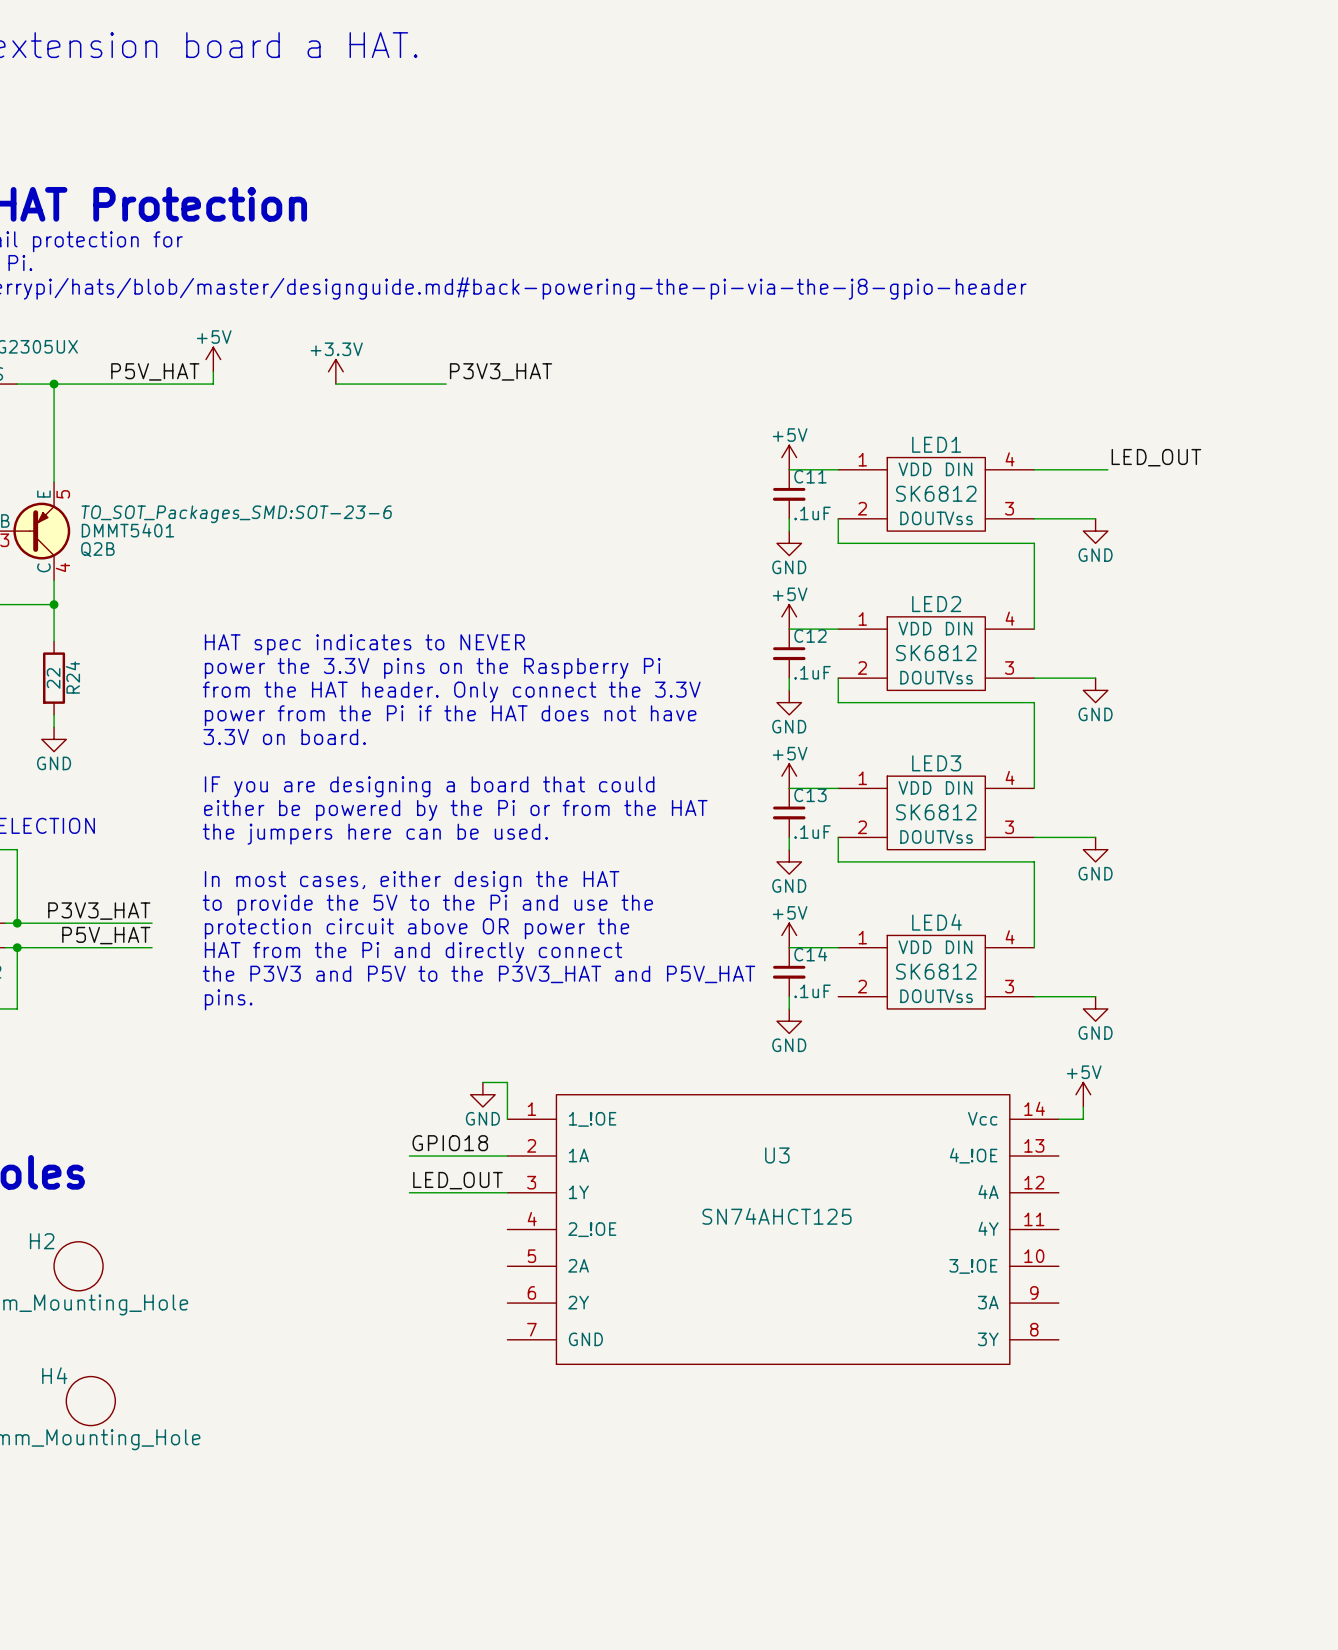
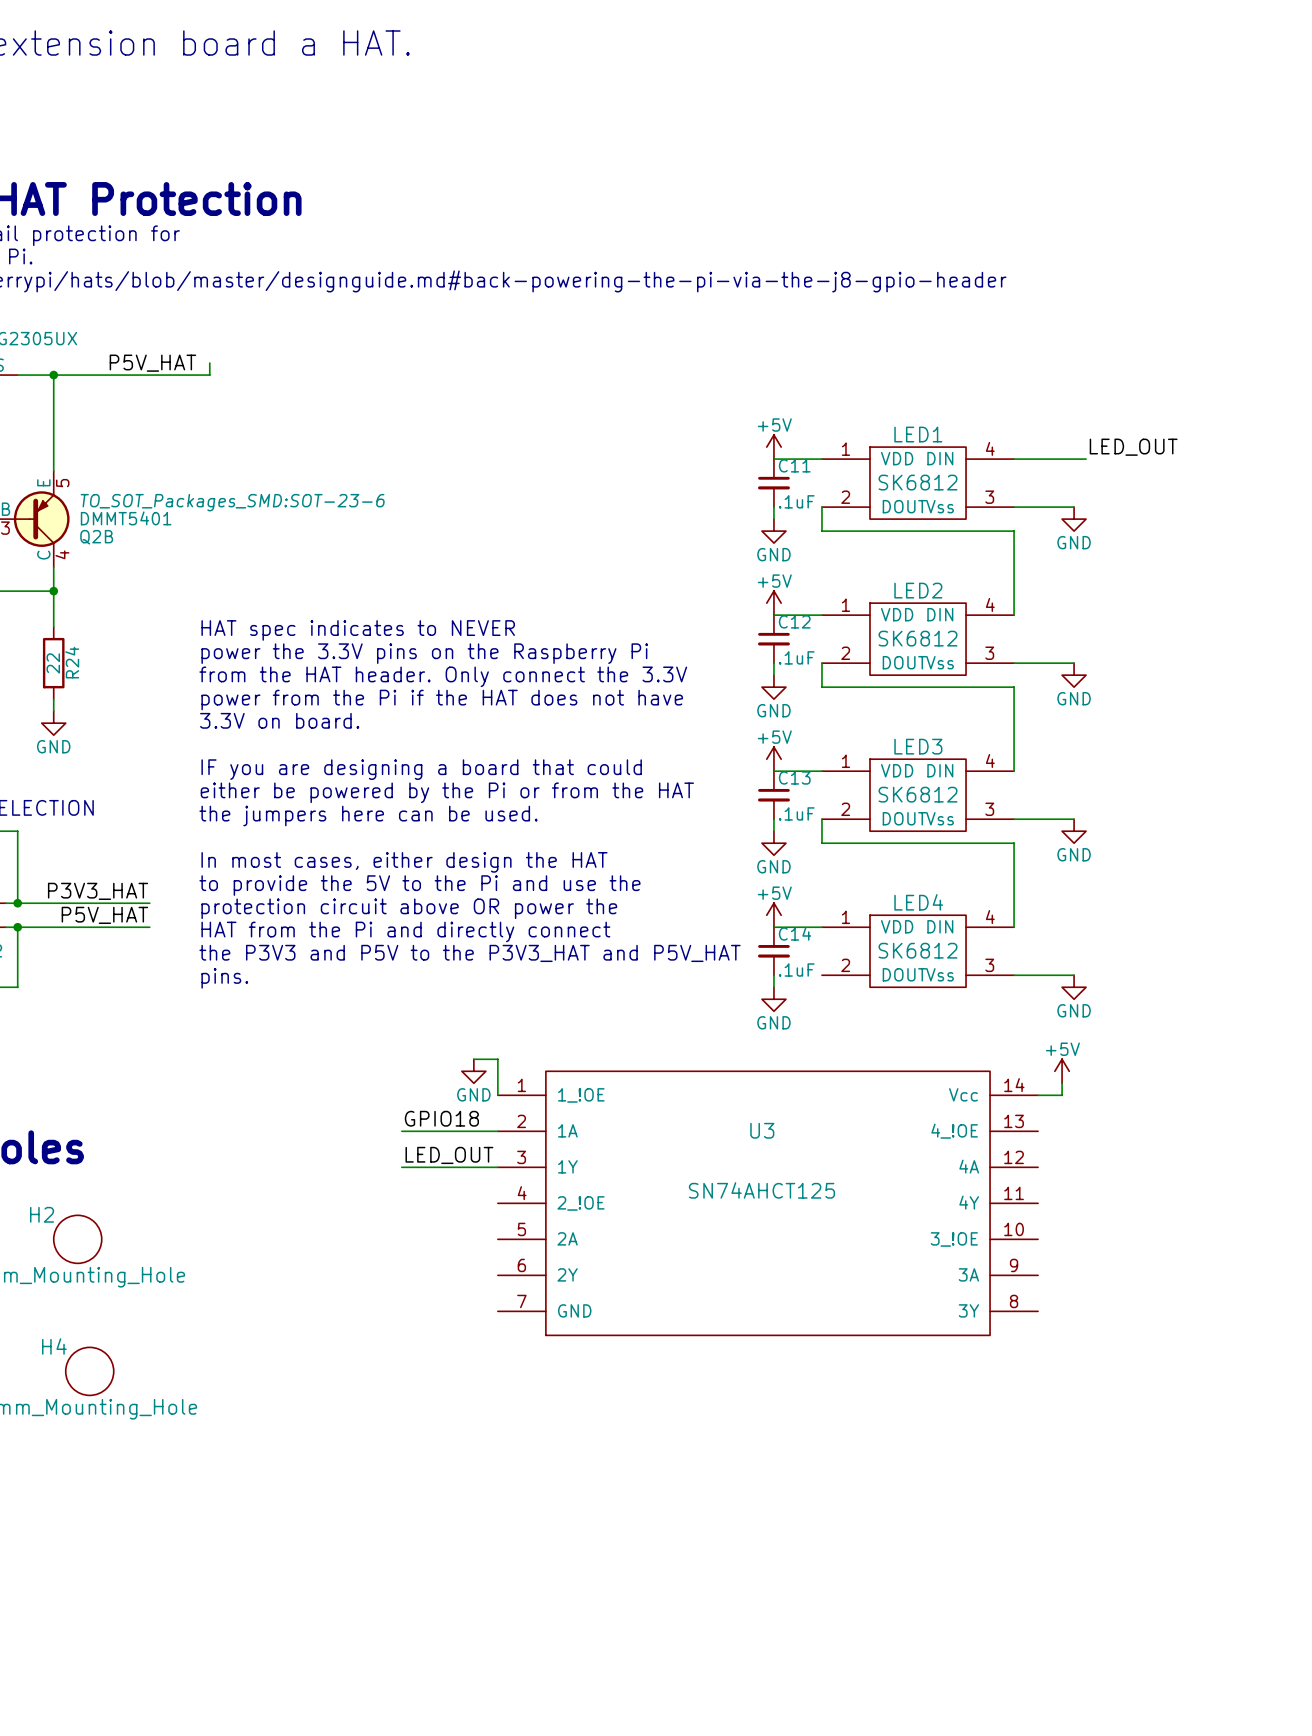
power symbol: +5V (213, 359) -> none
power symbol: +3.3V (335, 371) -> none
label: P3V3_HAT (501, 371) -> none
wire: (335, 384) (446, 384) -> none

